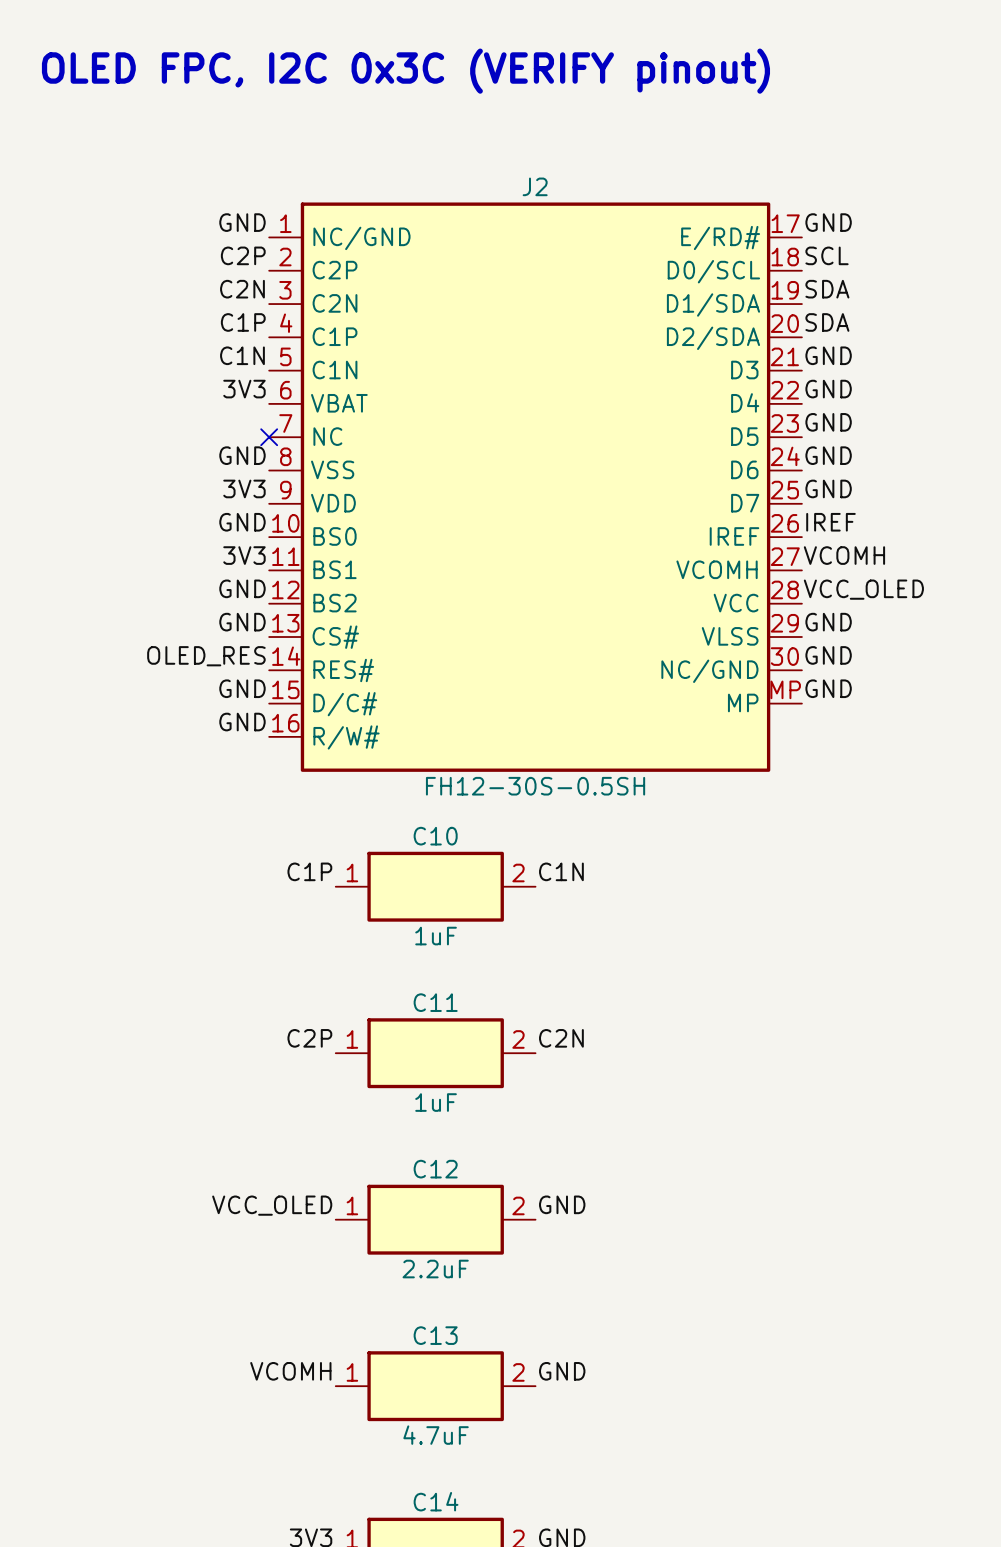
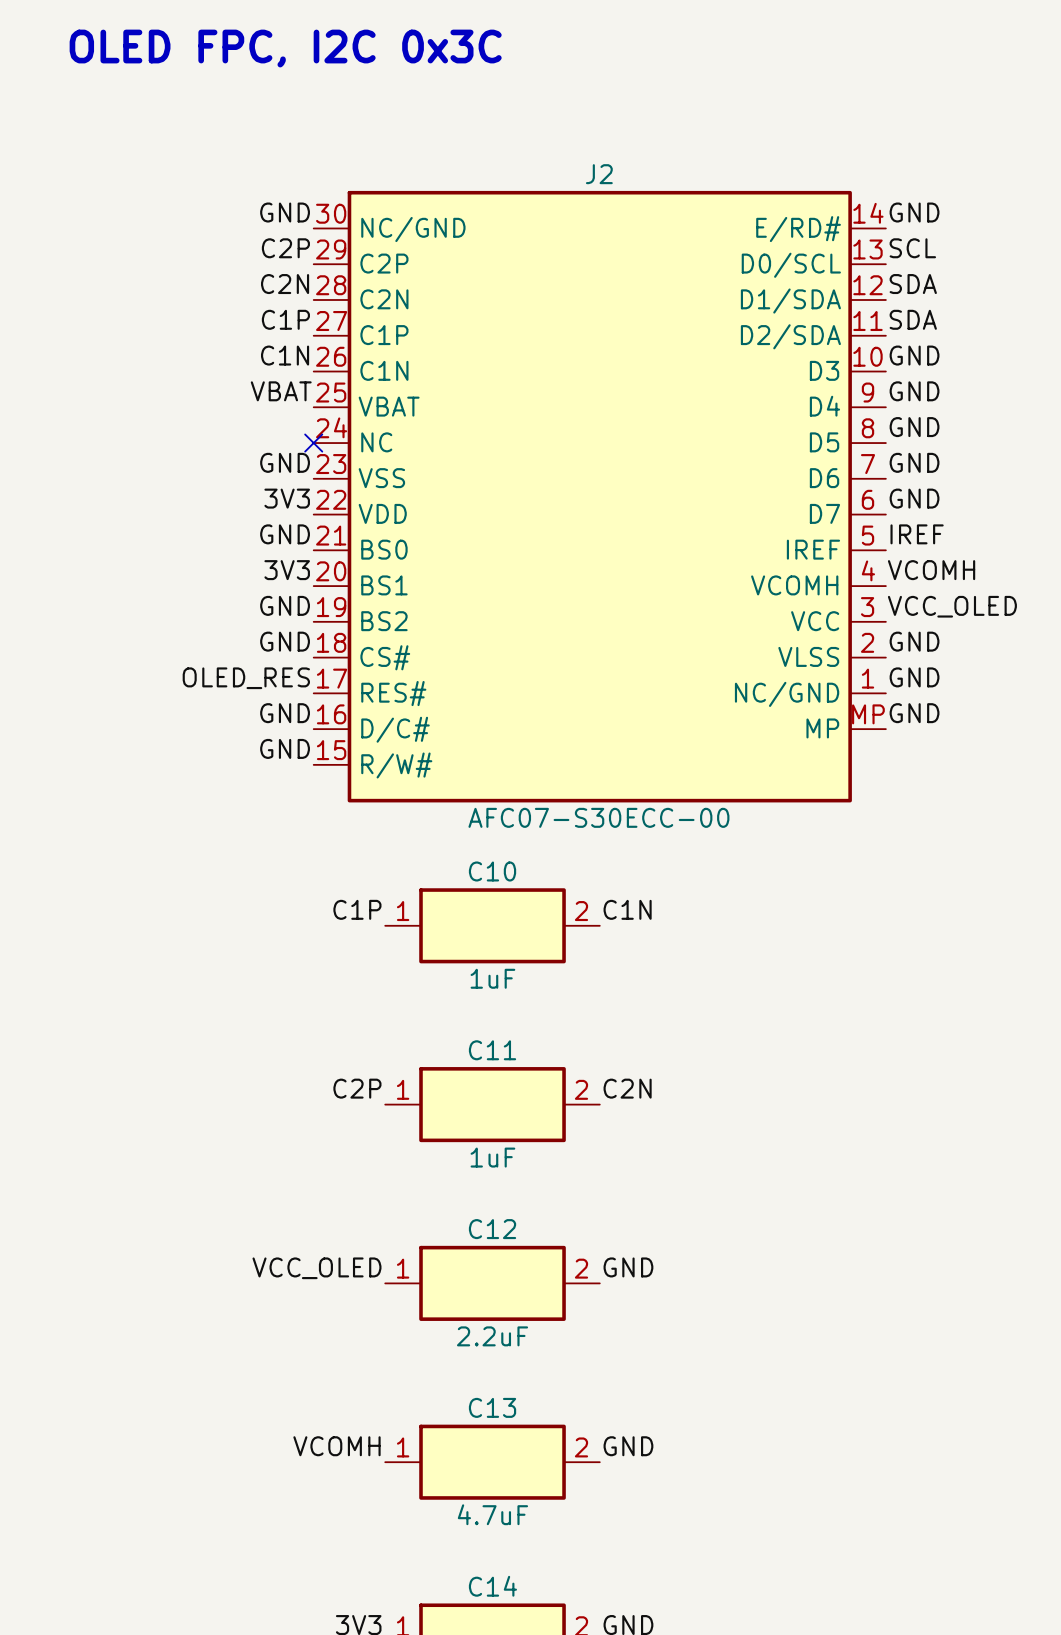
text: OLED FPC, I2C 0x3C (VERIFY pinout) (405, 71) -> OLED FPC, I2C 0x3C (285, 48)
J2 symbol: [269, 202, 802, 772] -> [313, 190, 886, 803]
label: 3V3 (244, 389) -> VBAT (281, 391)
J2 value: FH12-30S-0.5SH (535, 786) -> AFC07-S30ECC-00 (598, 817)

